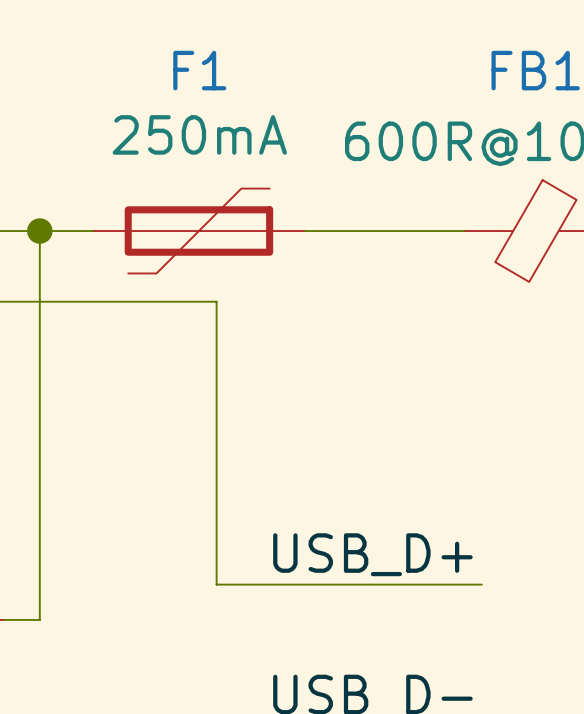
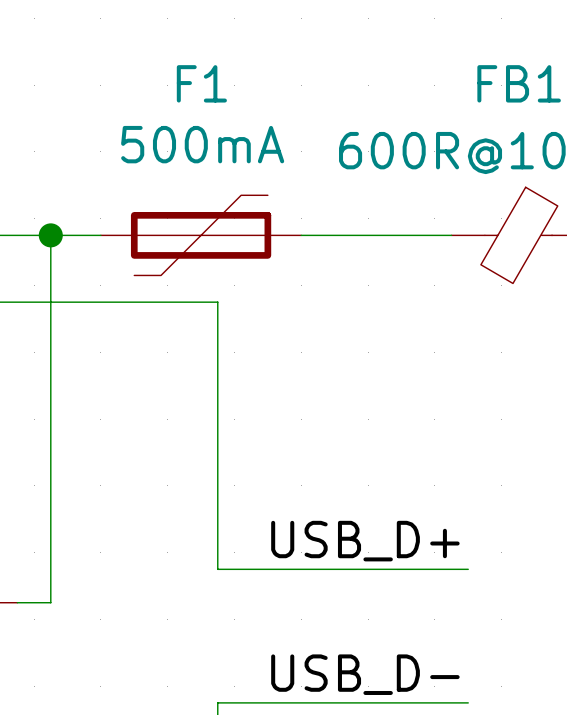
F1 value: 250mA (199, 134) -> 500mA (202, 144)

